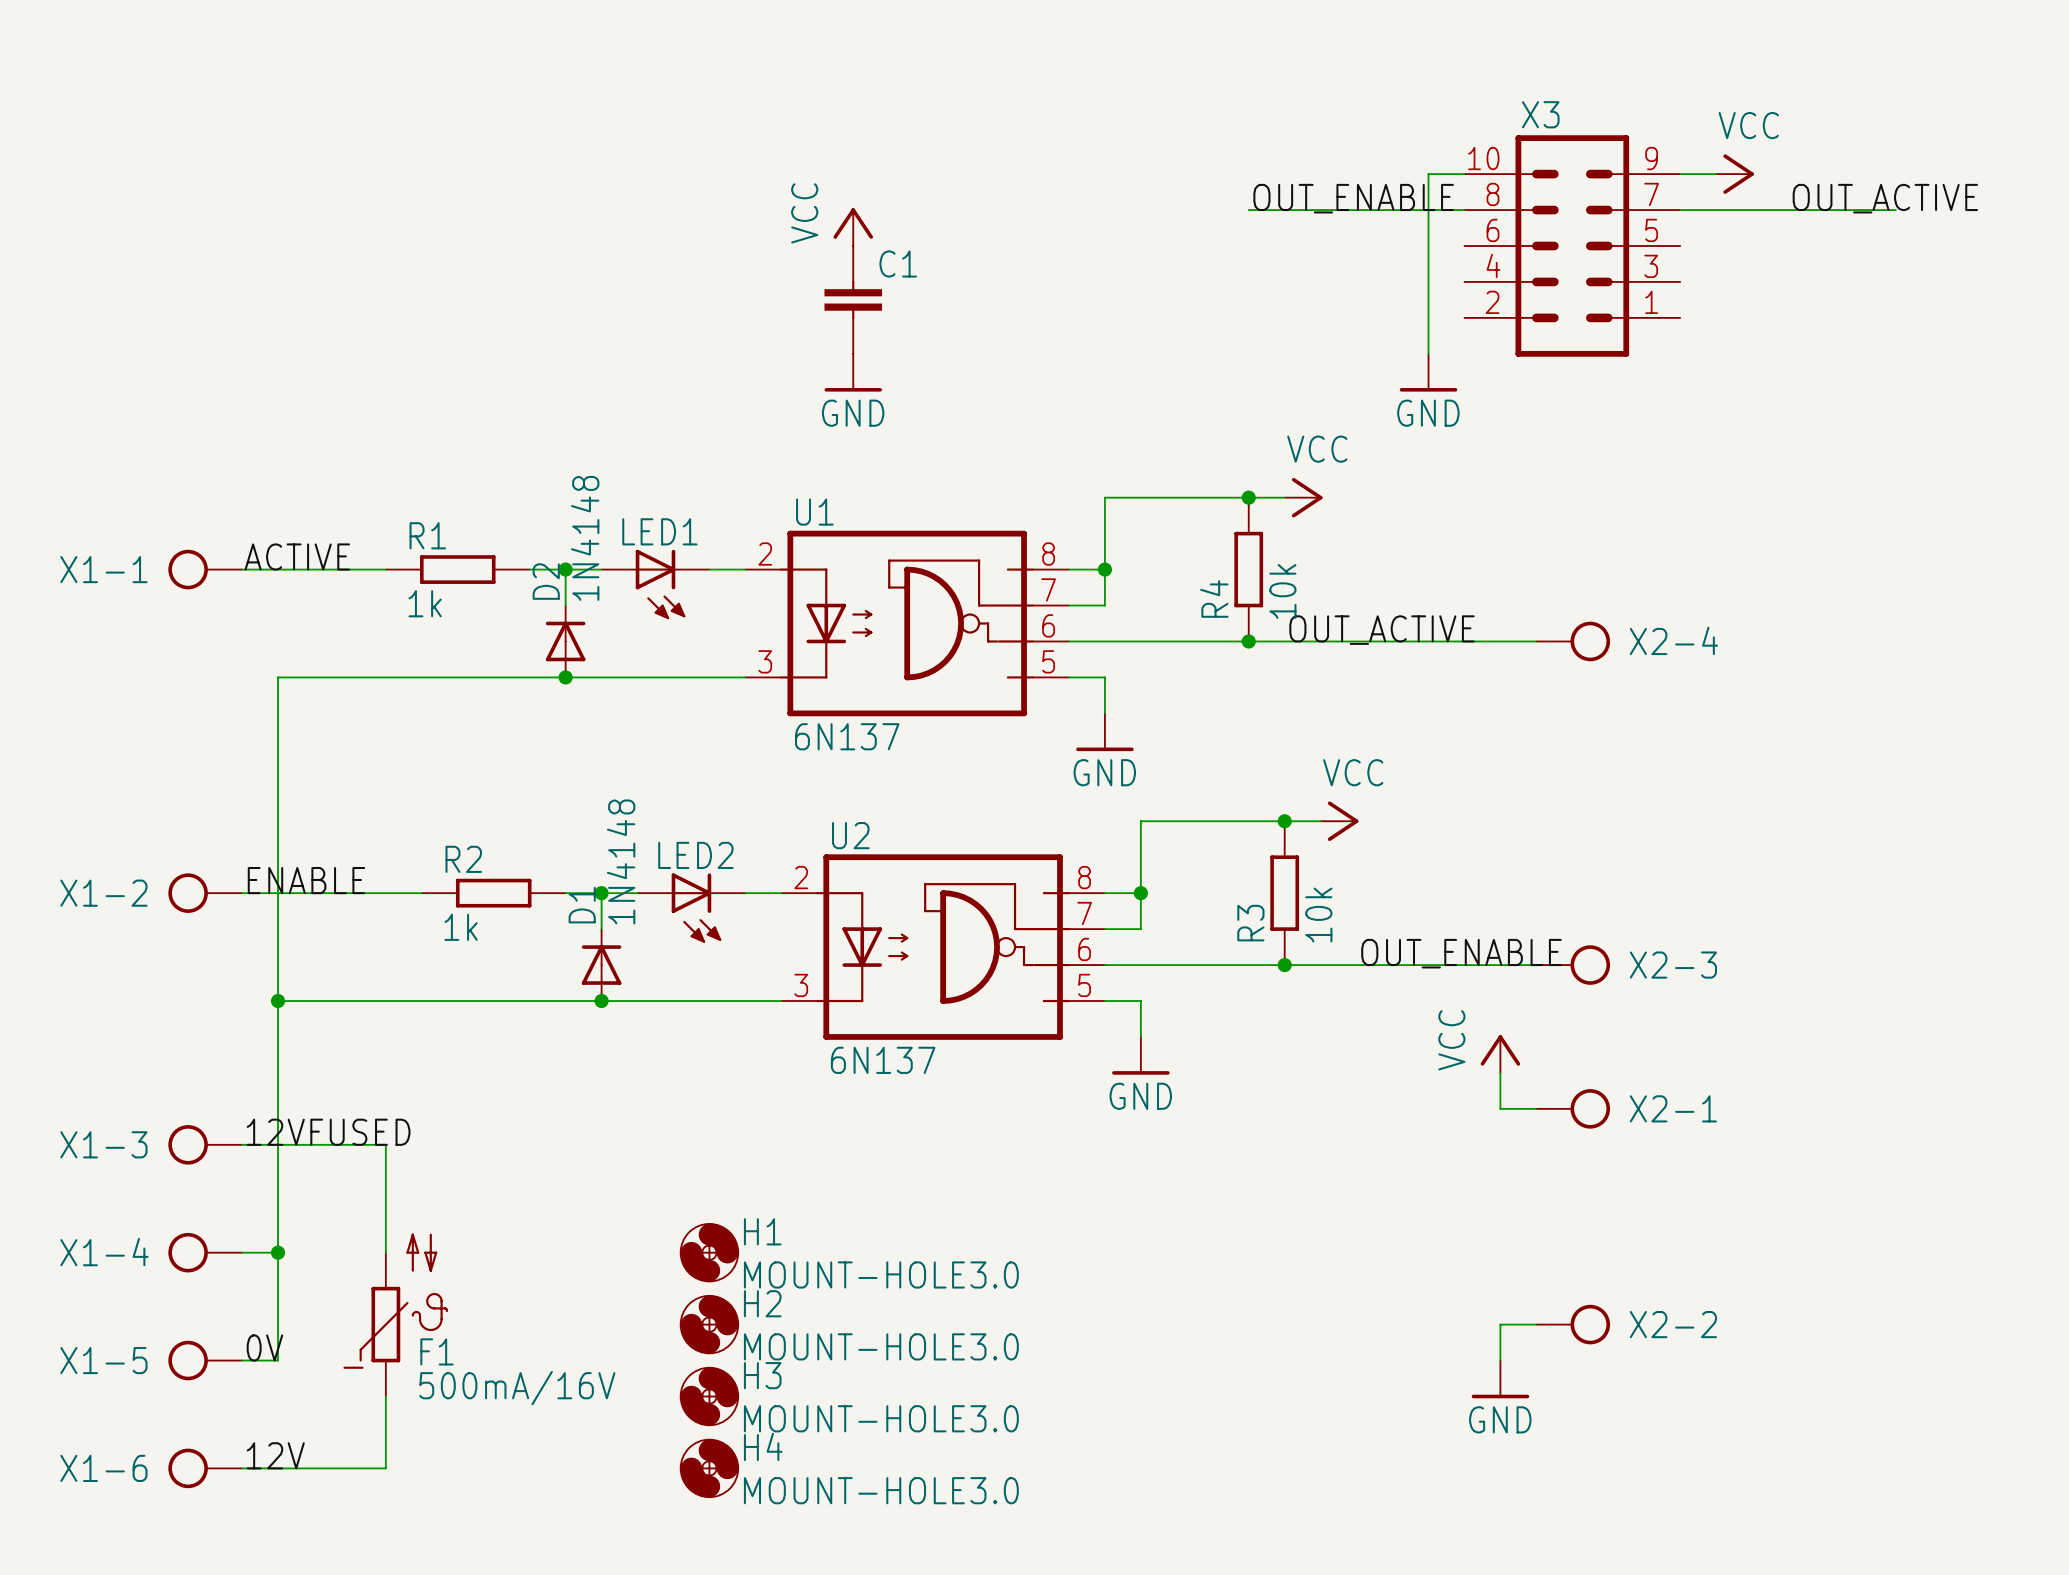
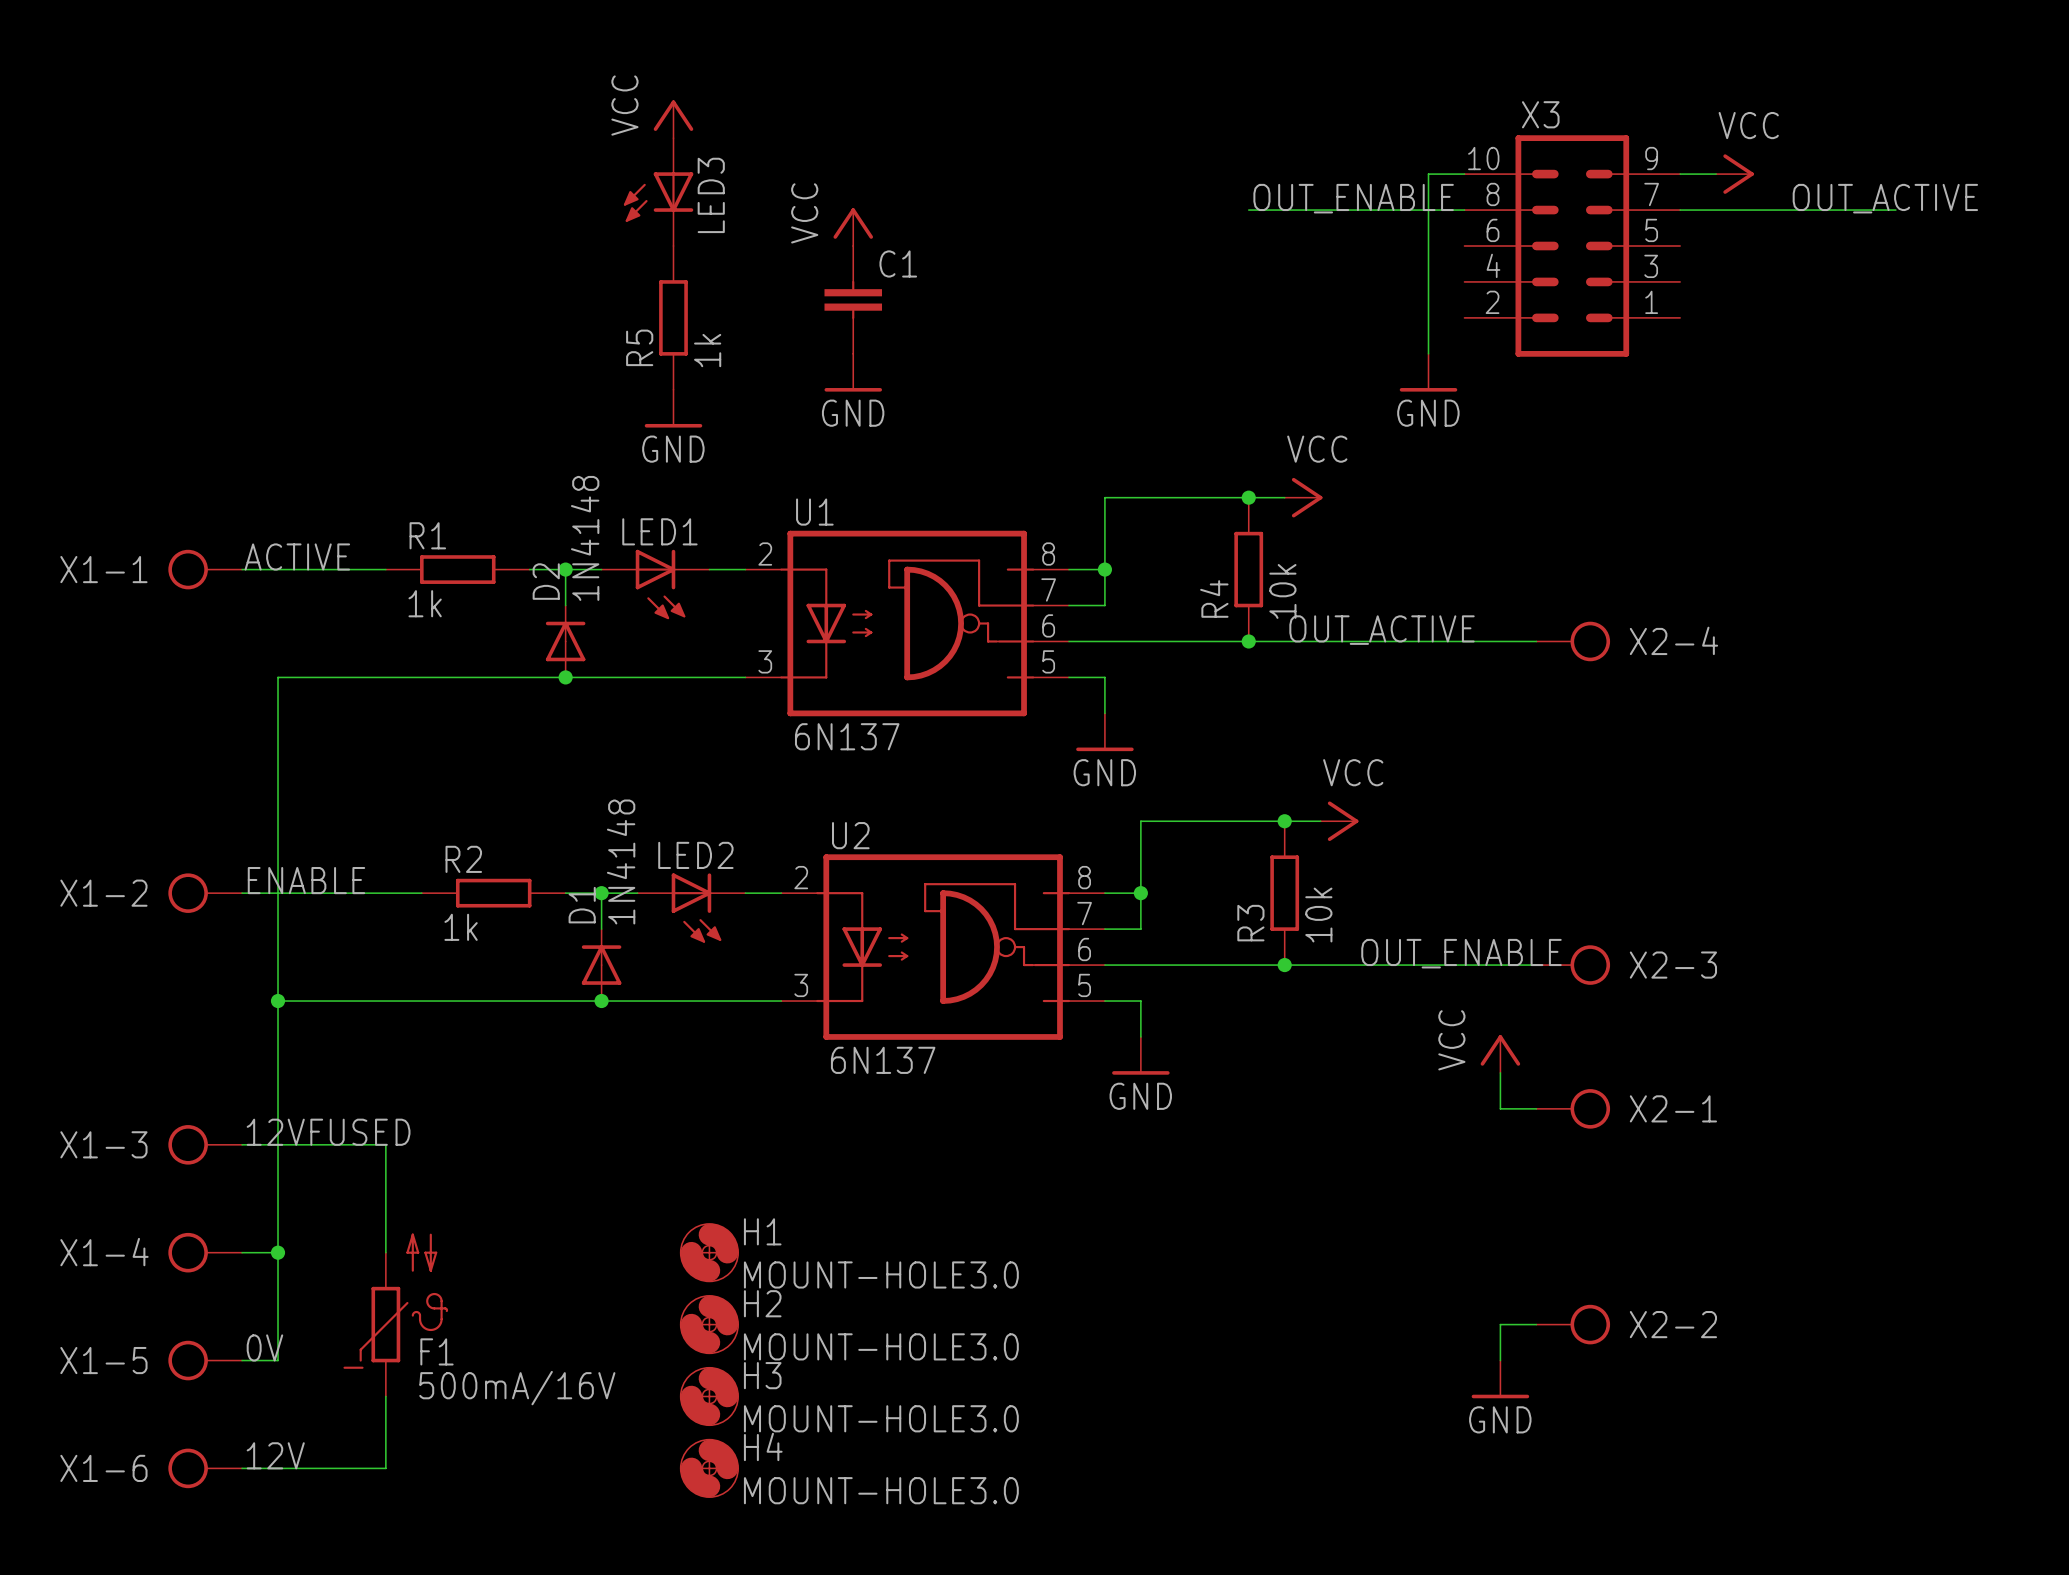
power symbol: none -> VCC (673, 119)
LED3: none -> (658, 192)
R5: none -> 1k (673, 317)
power symbol: none -> GND (673, 408)

